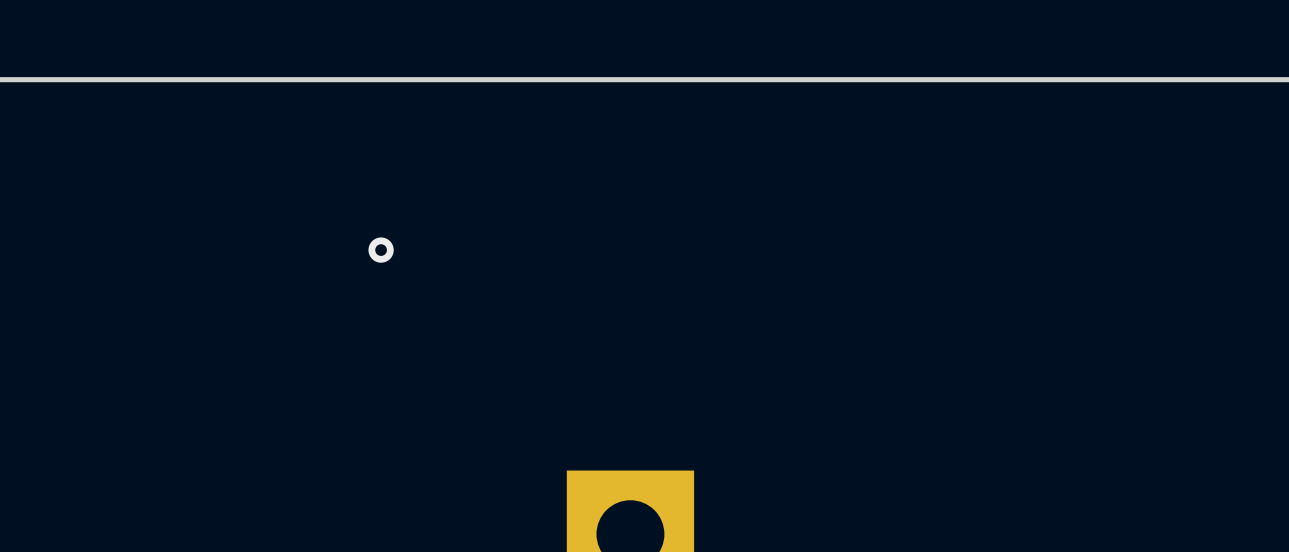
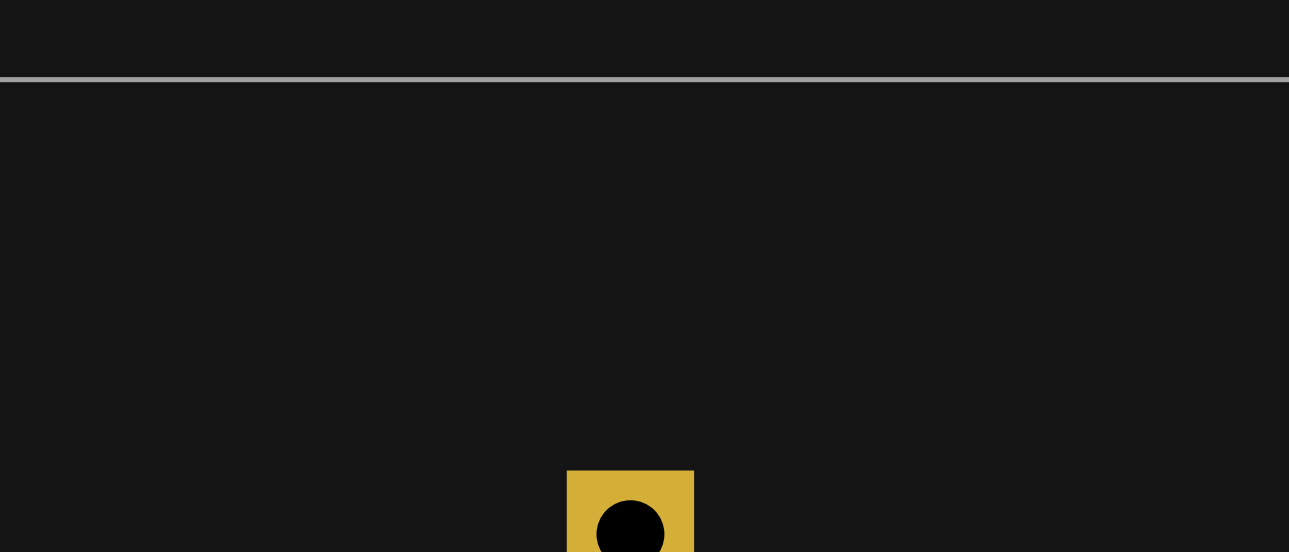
via: (381, 250) -> none

